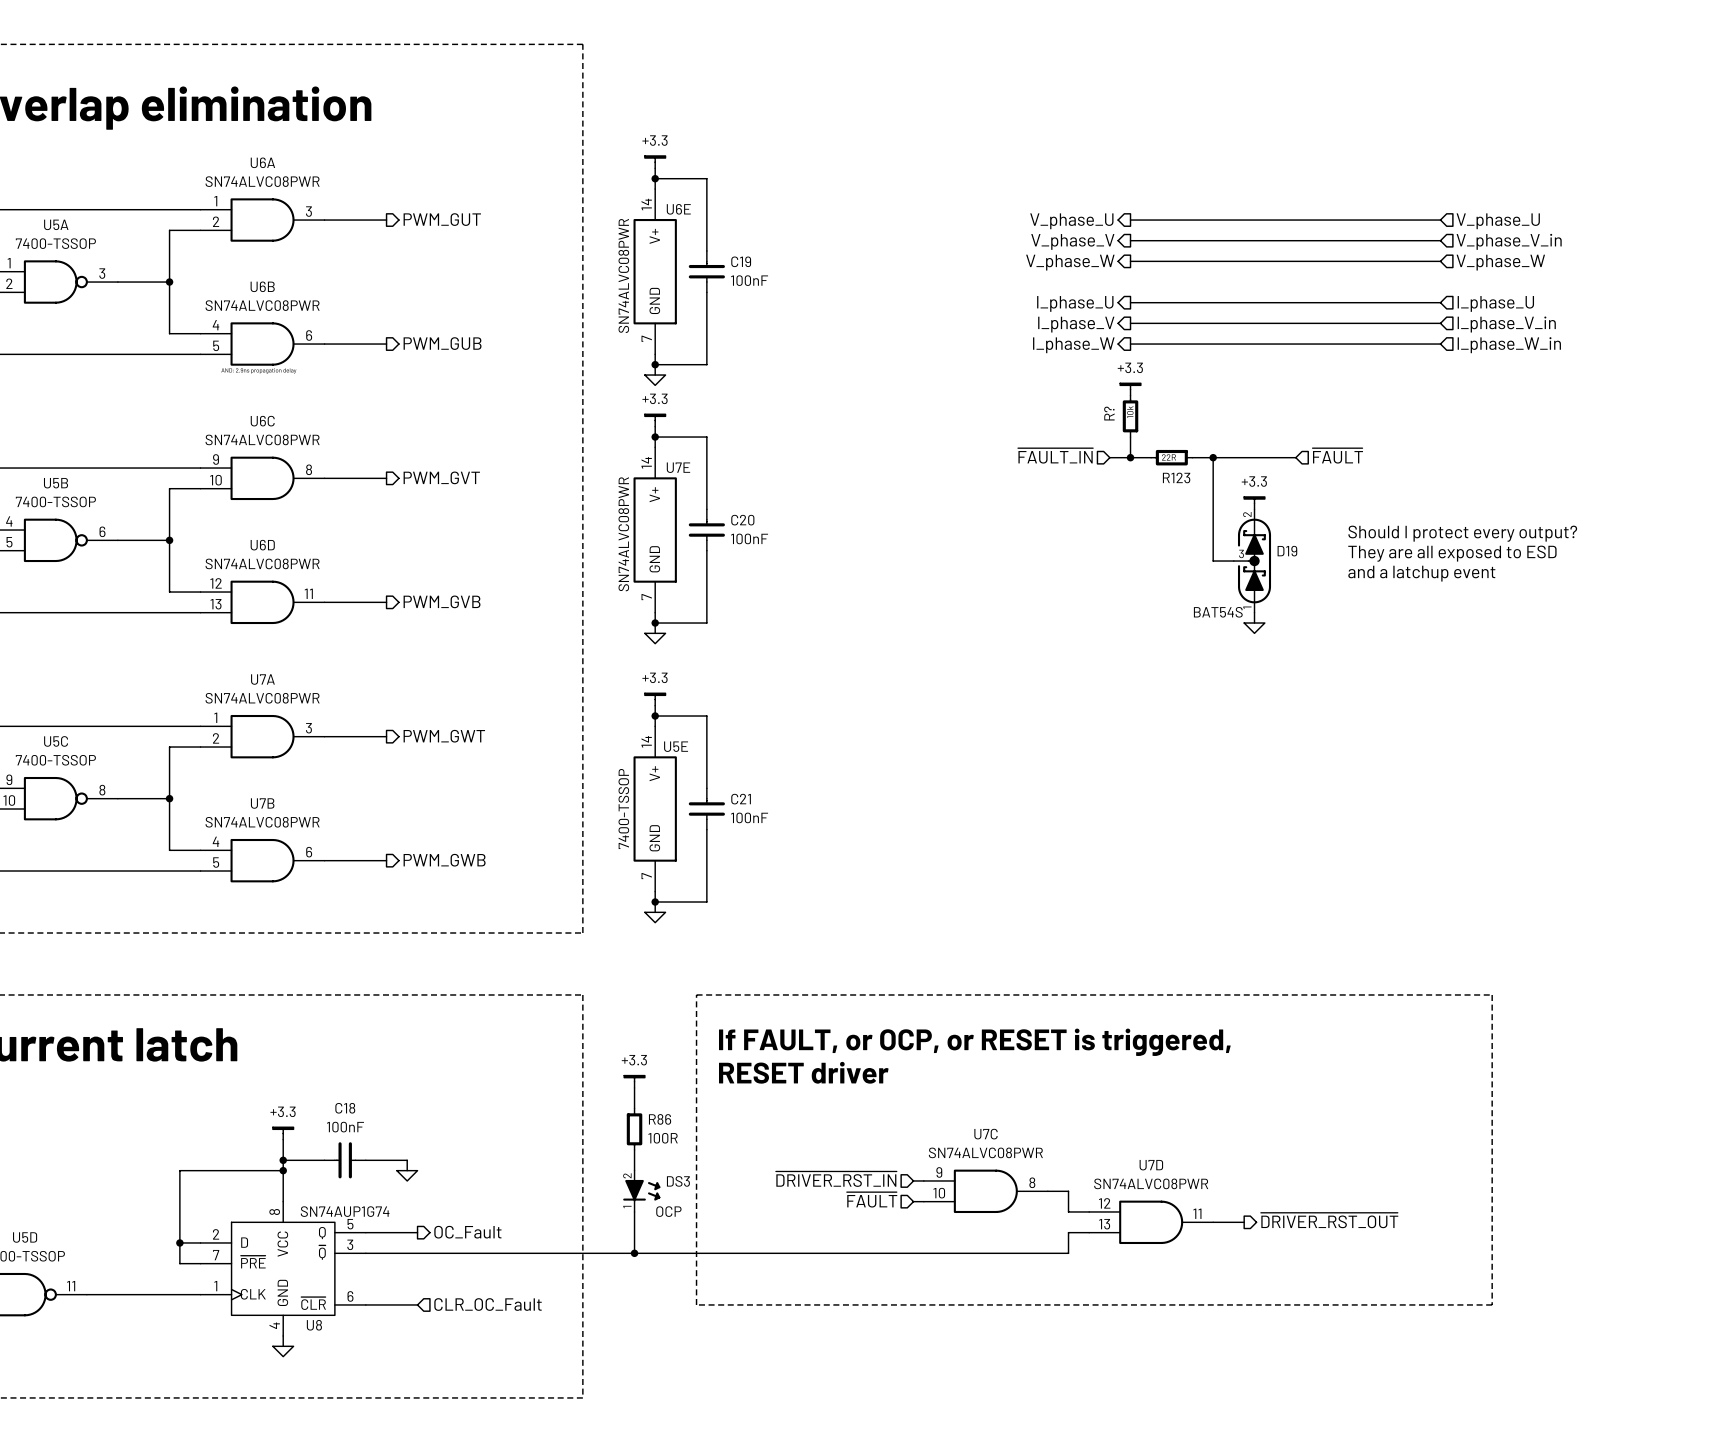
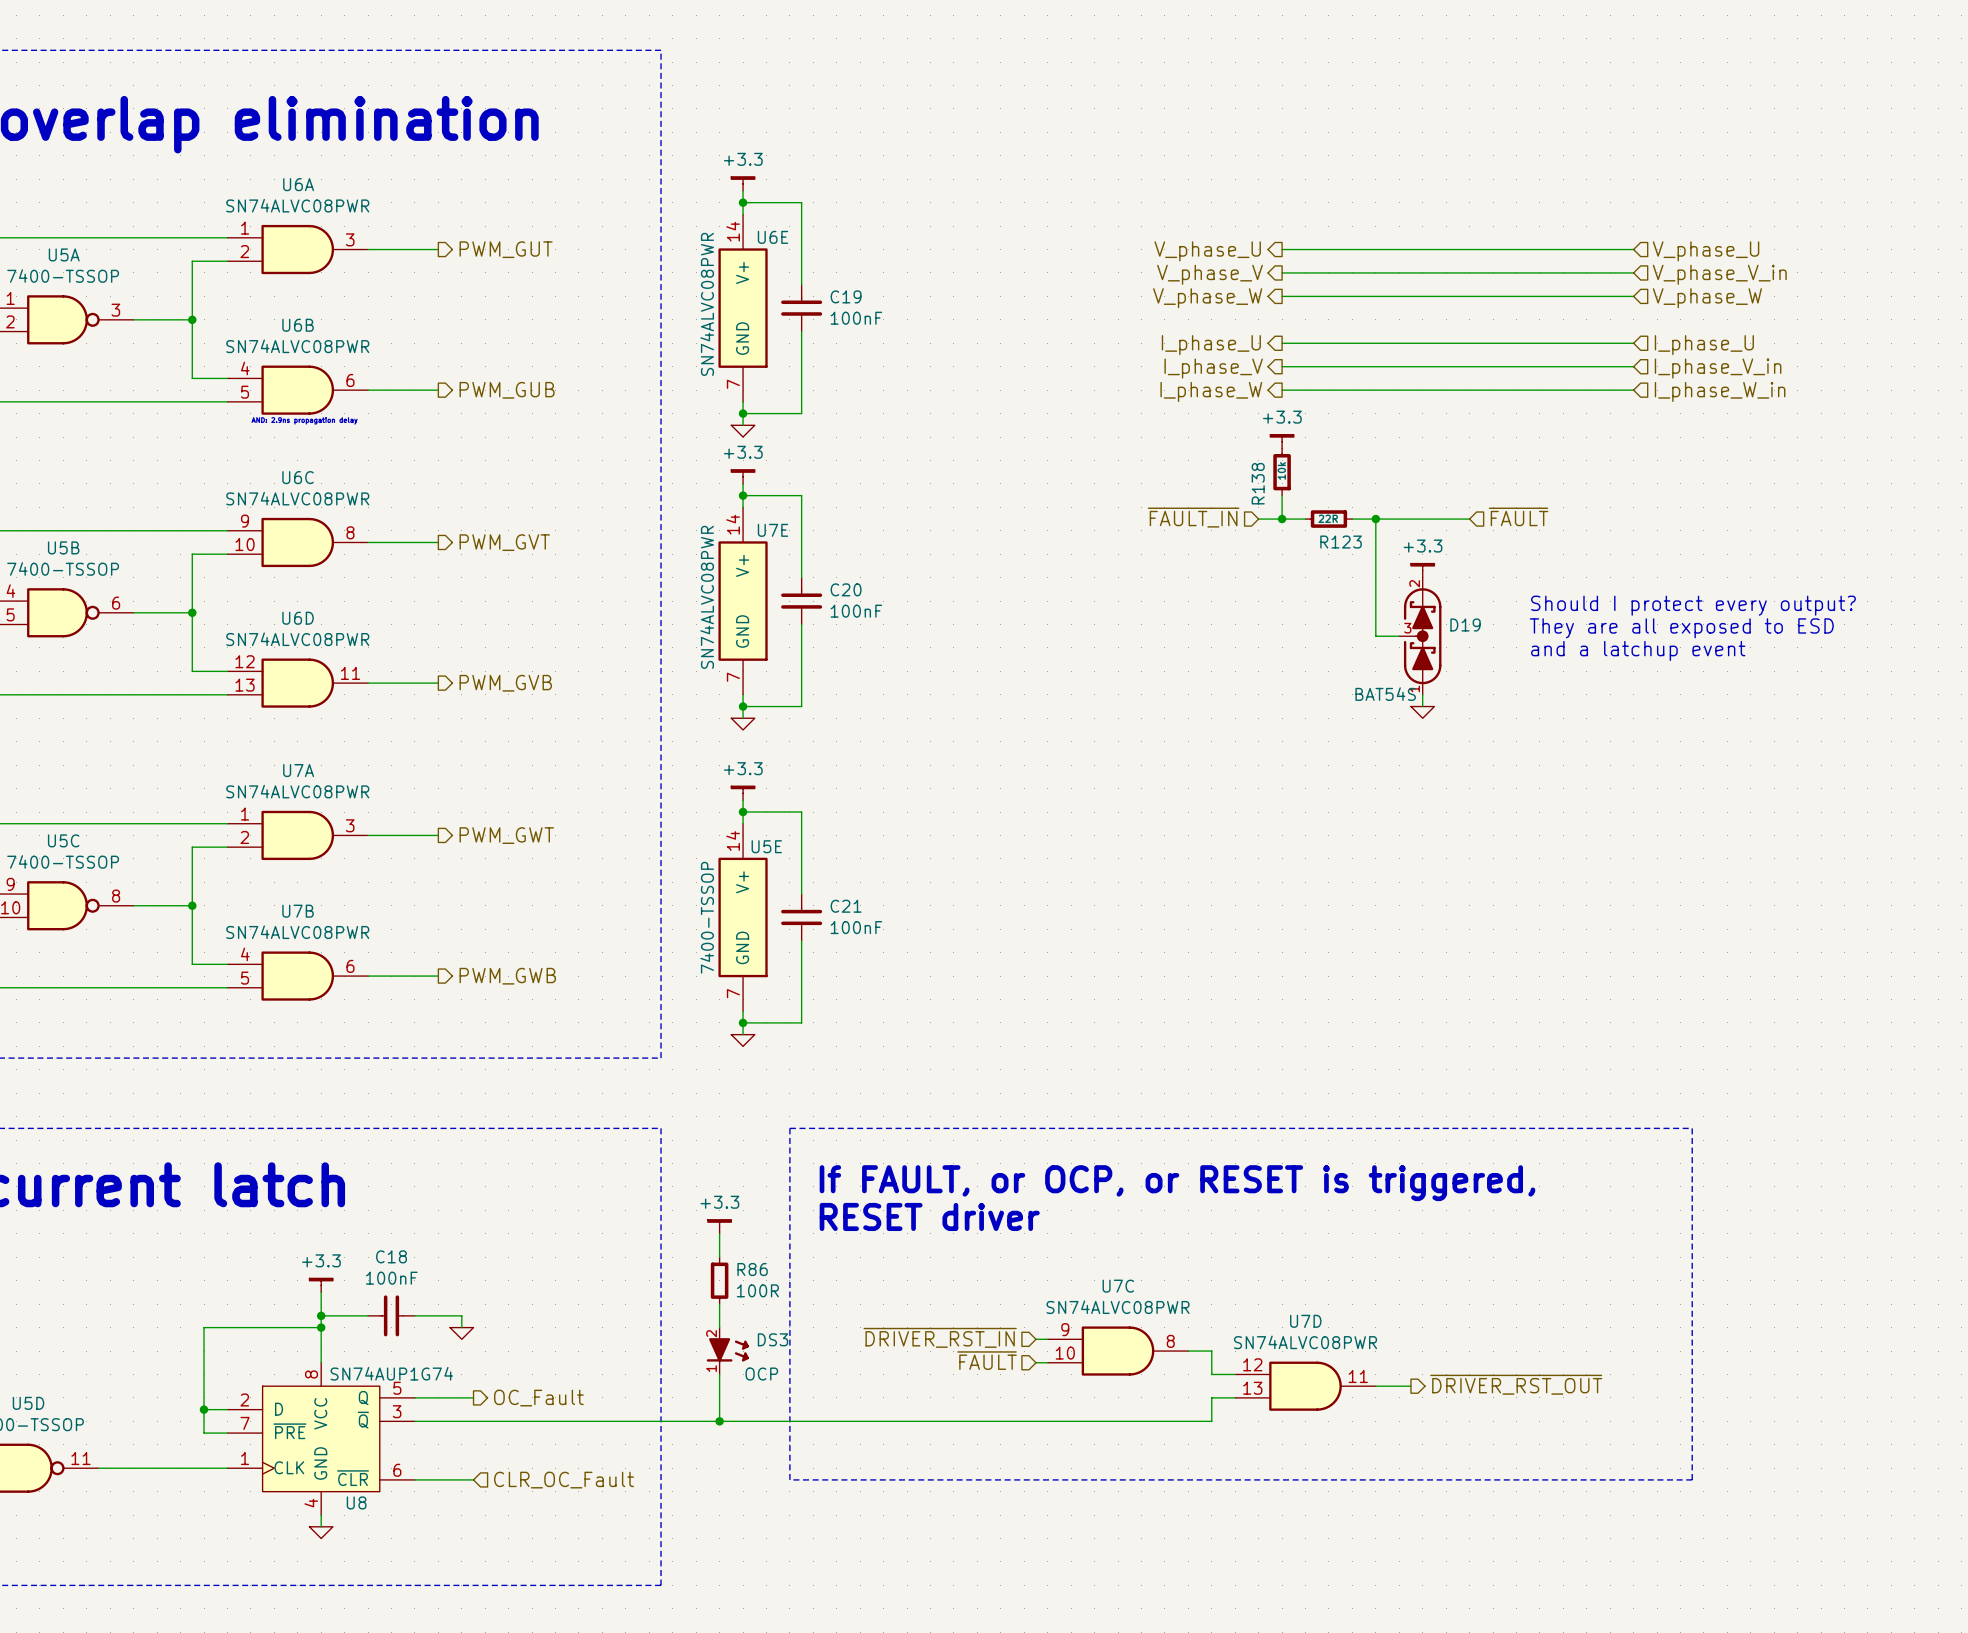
R? name: R? (1109, 413) -> R138 (1258, 483)

